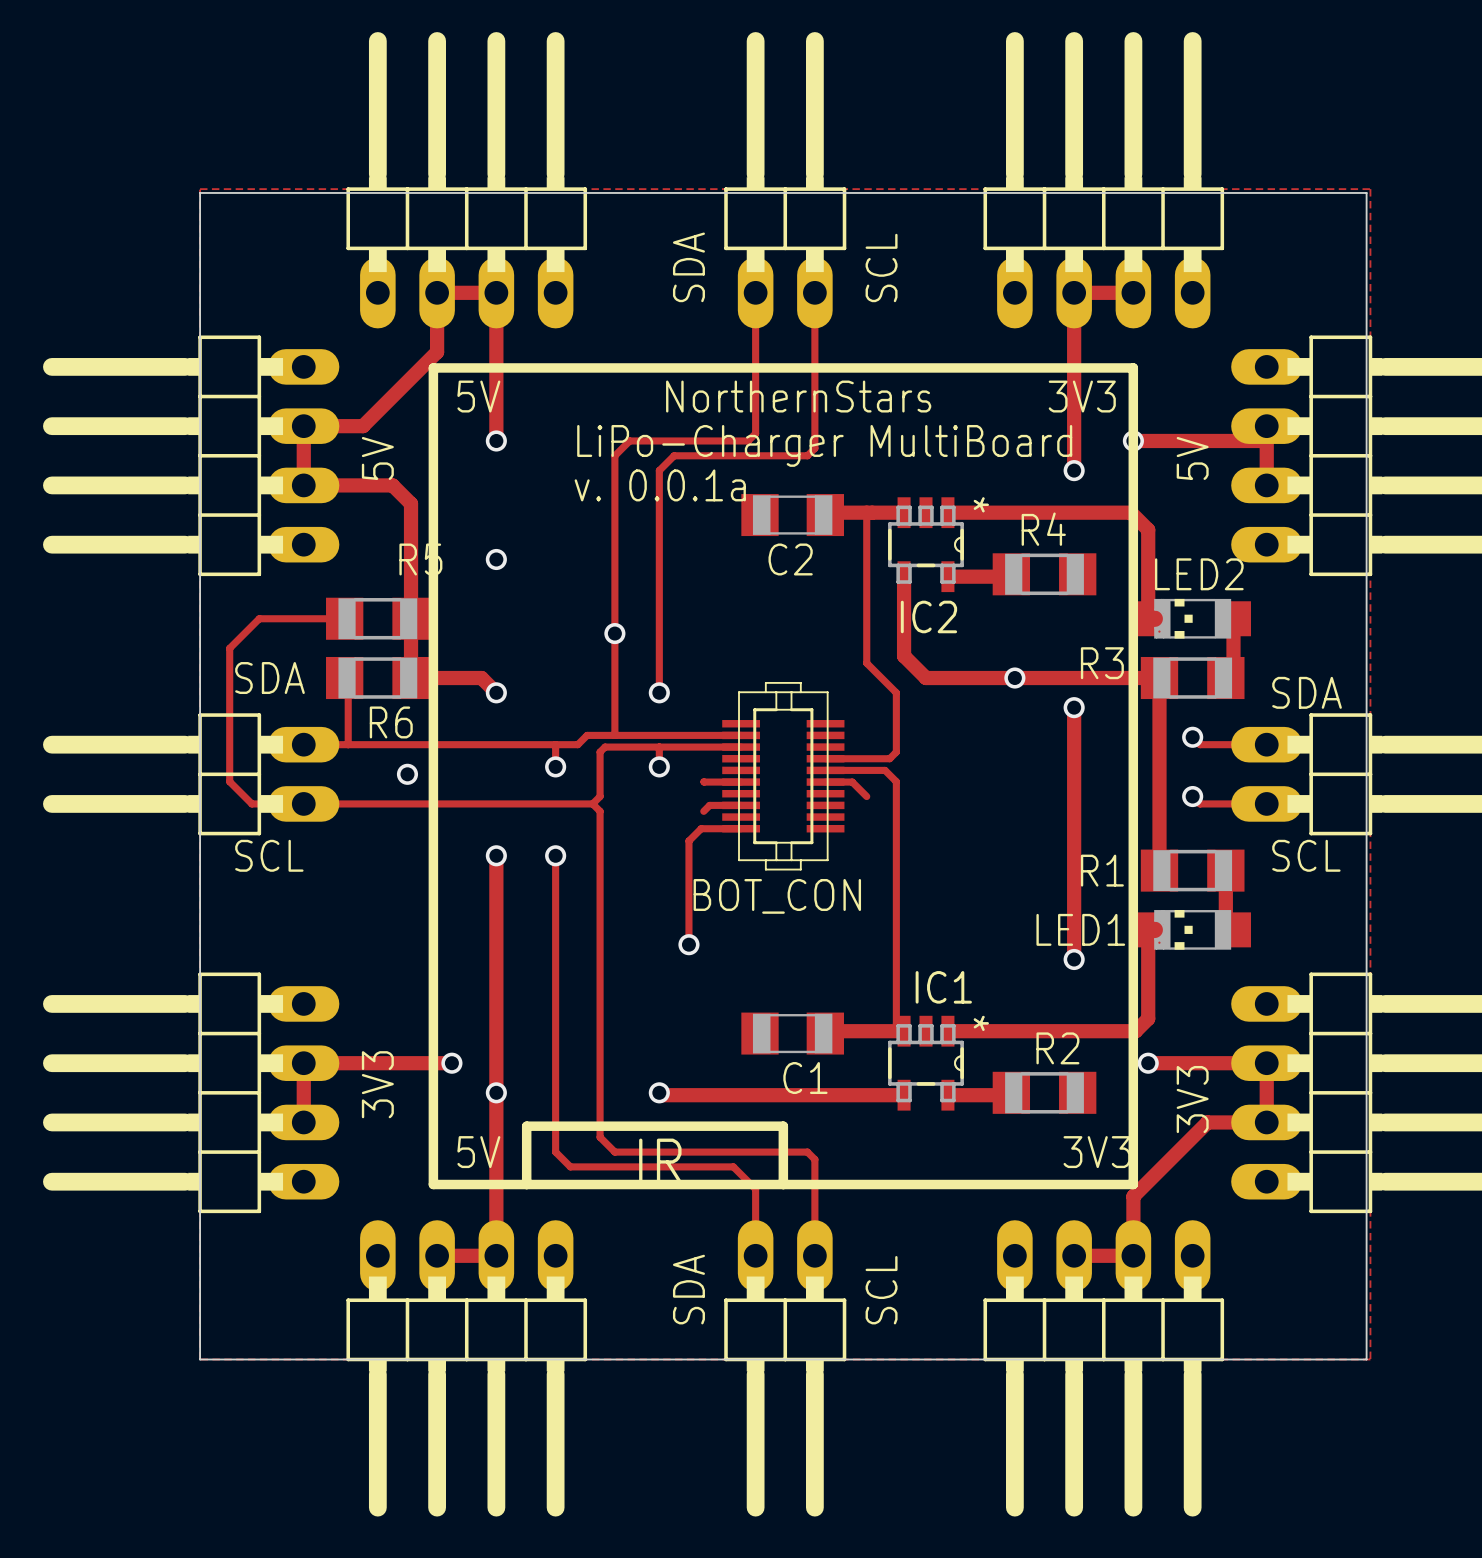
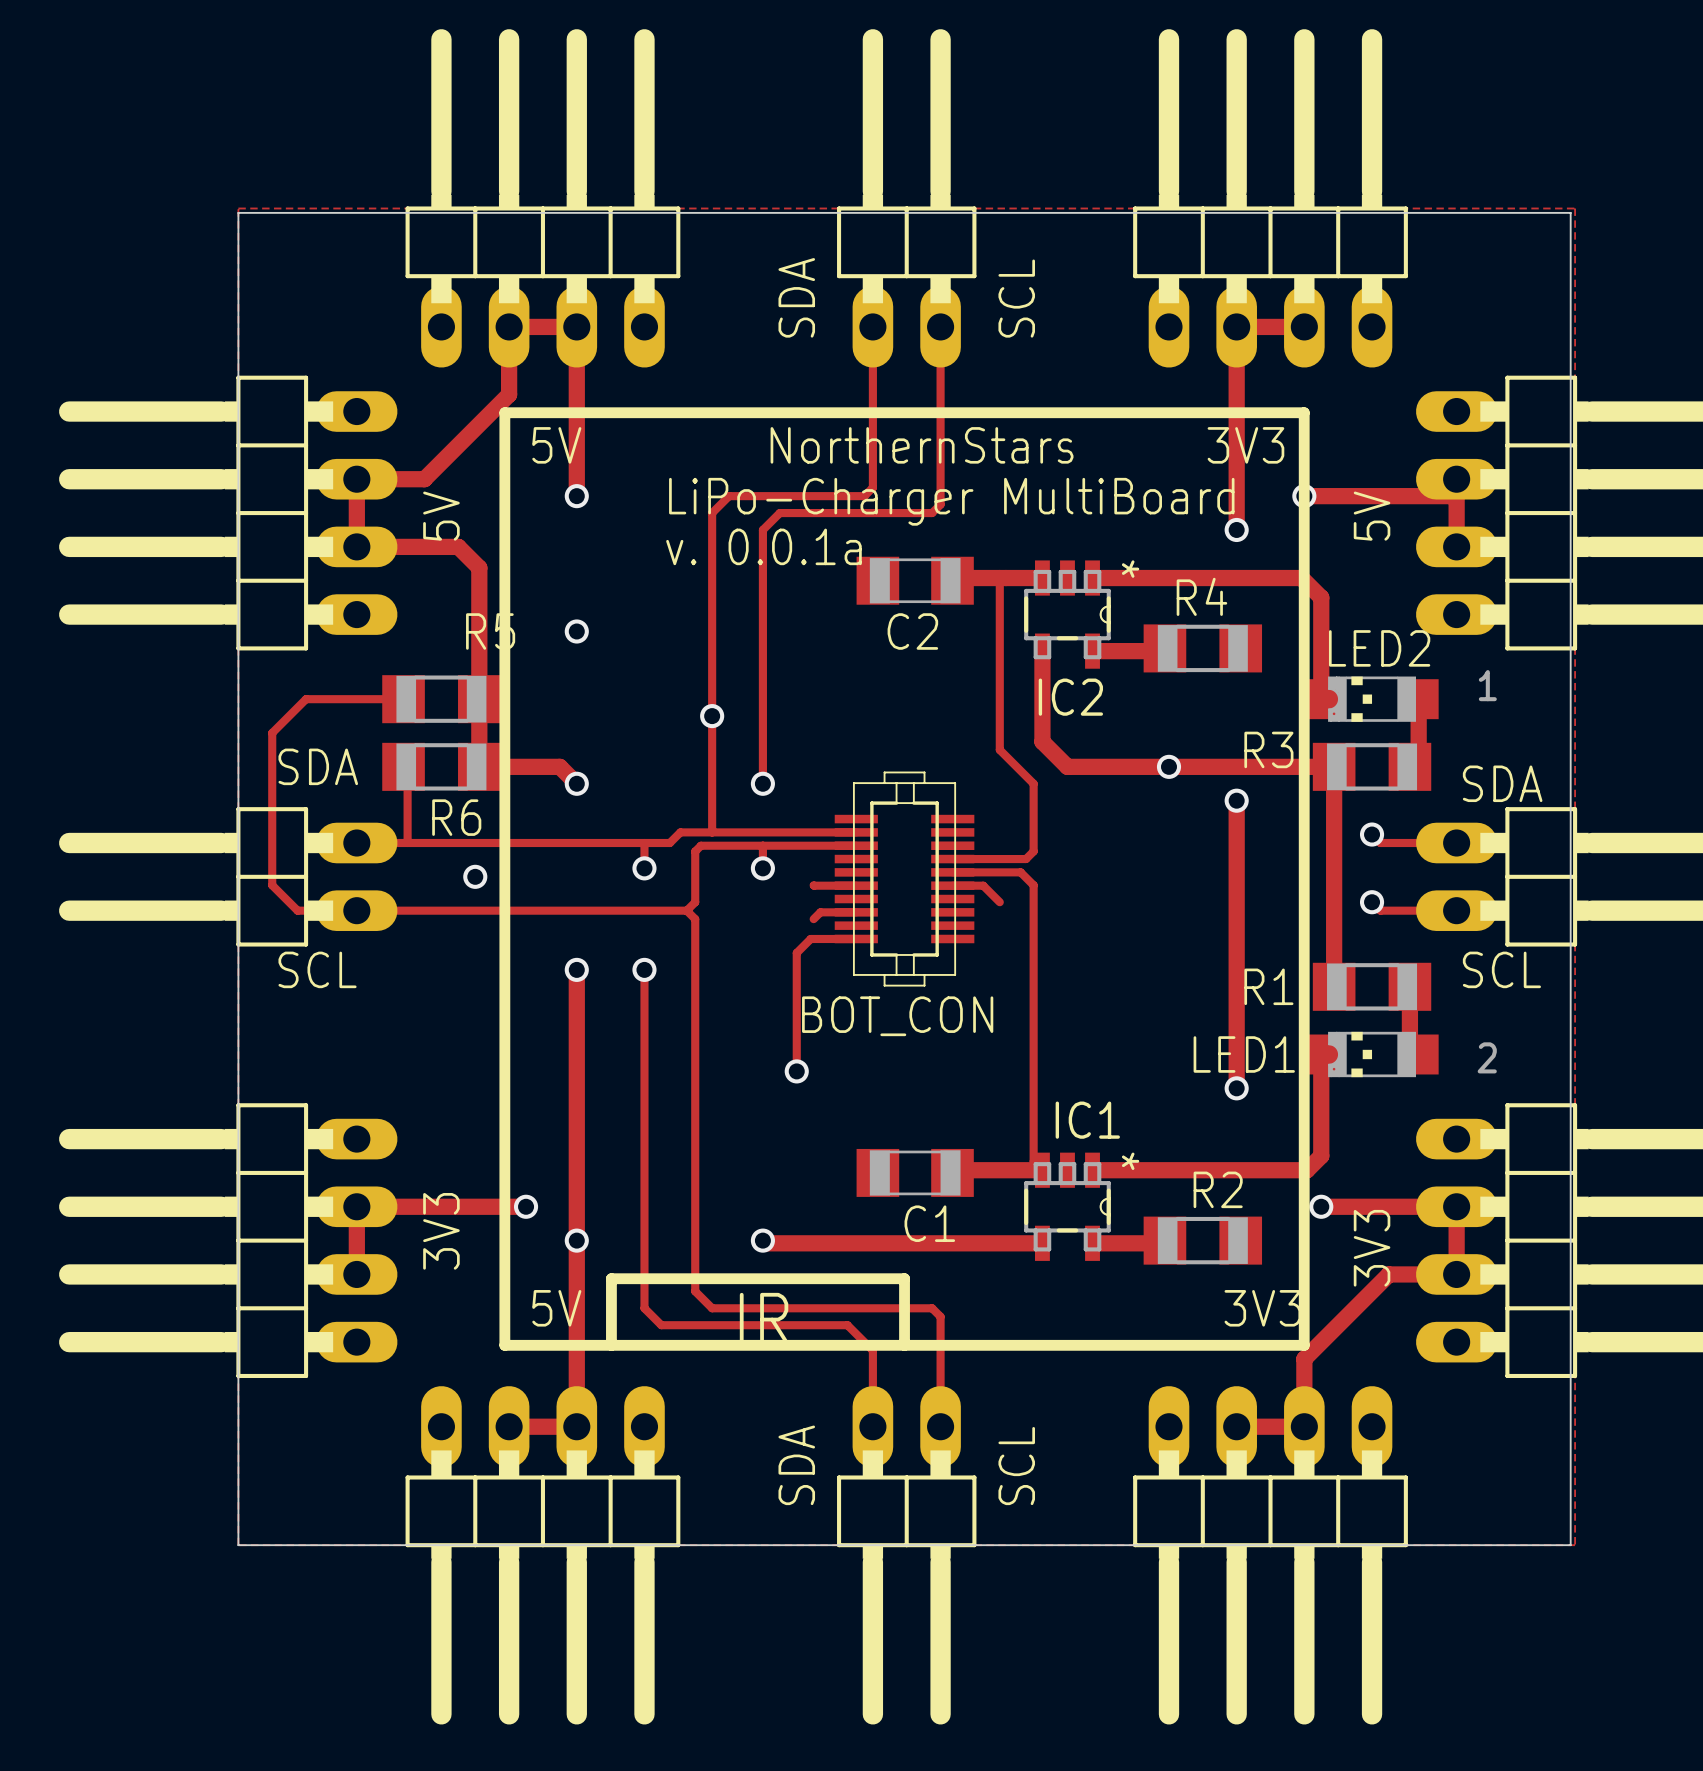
text: none -> 1 (1487, 685)
text: none -> 2 (1487, 1057)

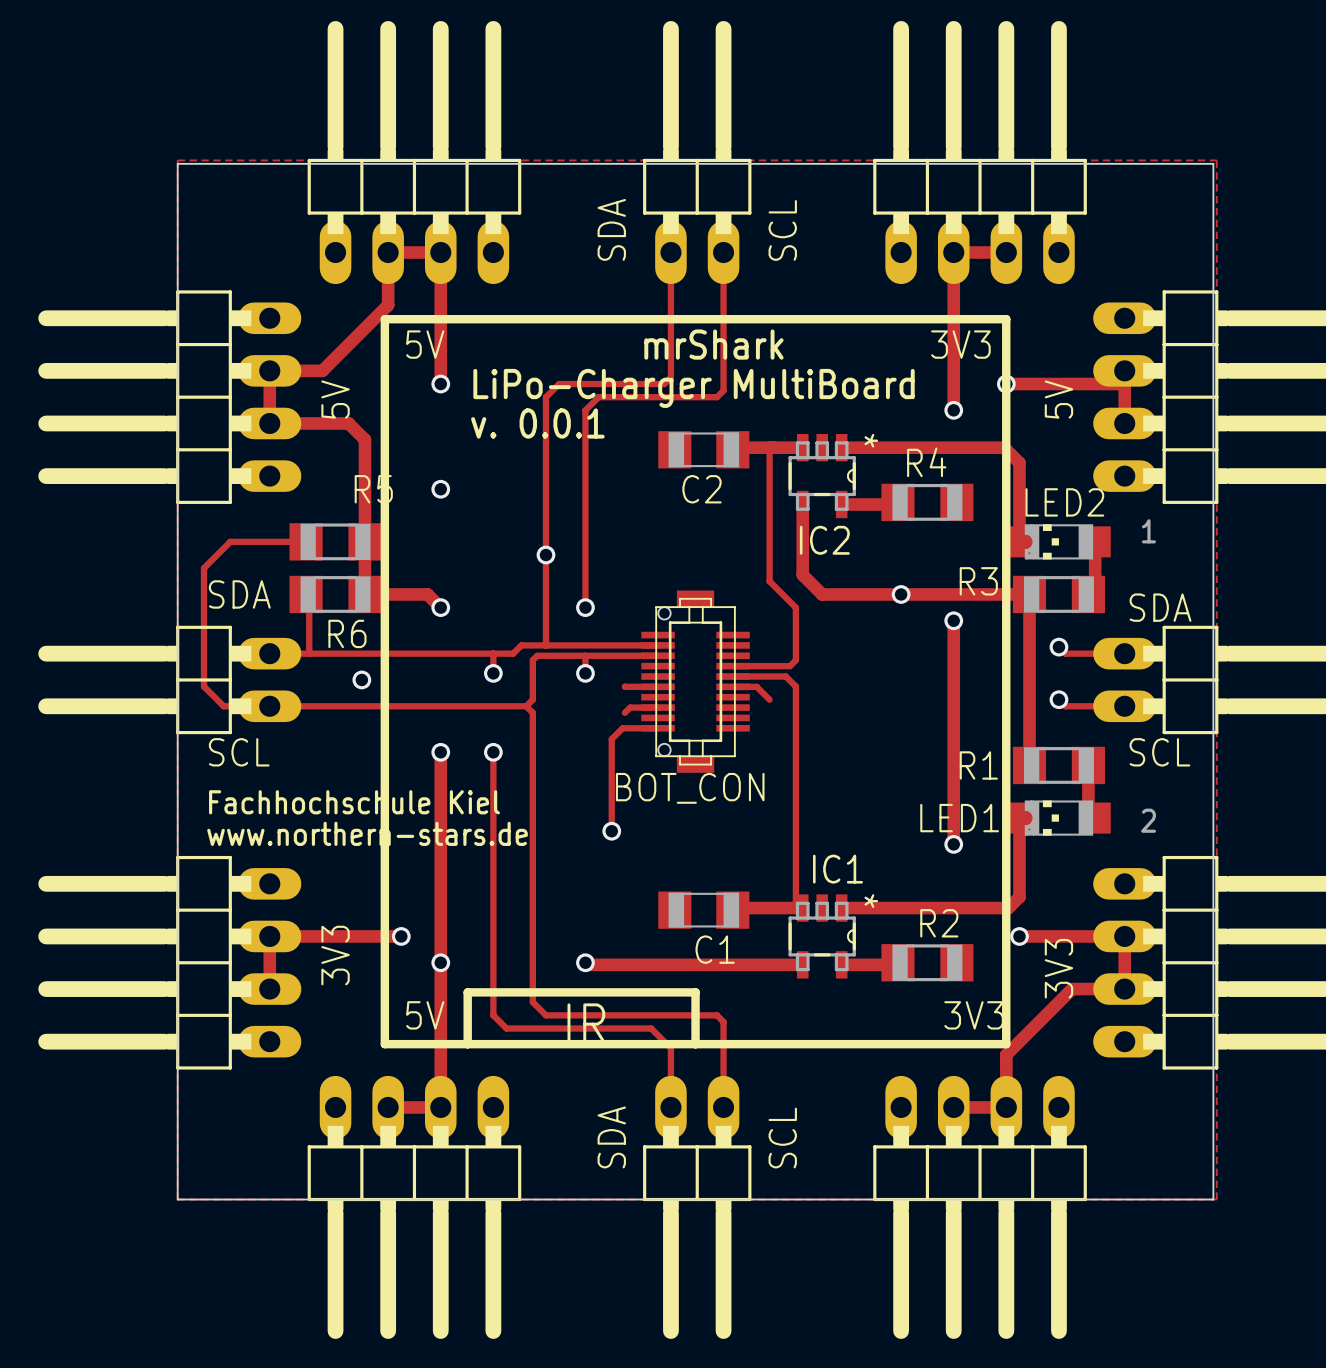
text: NorthernStars (922, 445) -> none
text: none -> mrShark (713, 344)
text position: LiPo-Charger MultiBoard (951, 501) -> LiPo-Charger MultiBoard (694, 388)
text: v. 0.0.1a (763, 546) -> v. 0.0.1 (537, 423)
BOT_CON footprint: [834, 771, 975, 987] -> [641, 590, 750, 773]
text: none -> Fachhochschule Kiel (354, 802)
text: none -> www.northern-stars.de (367, 833)

